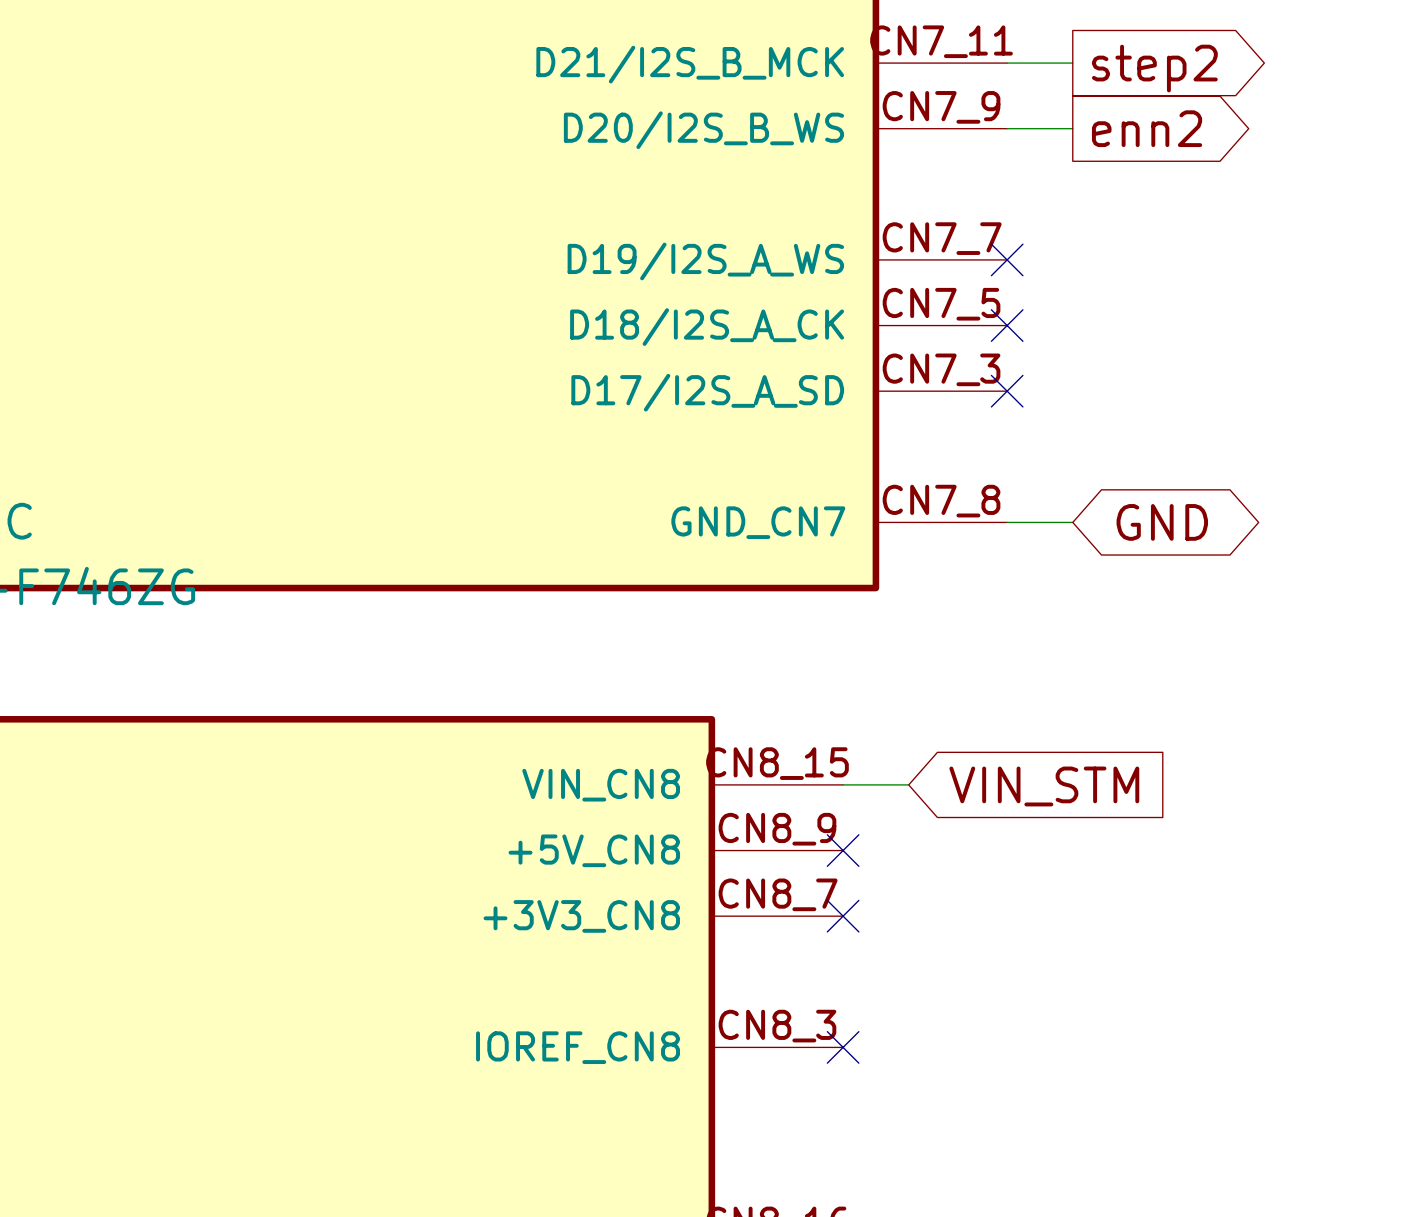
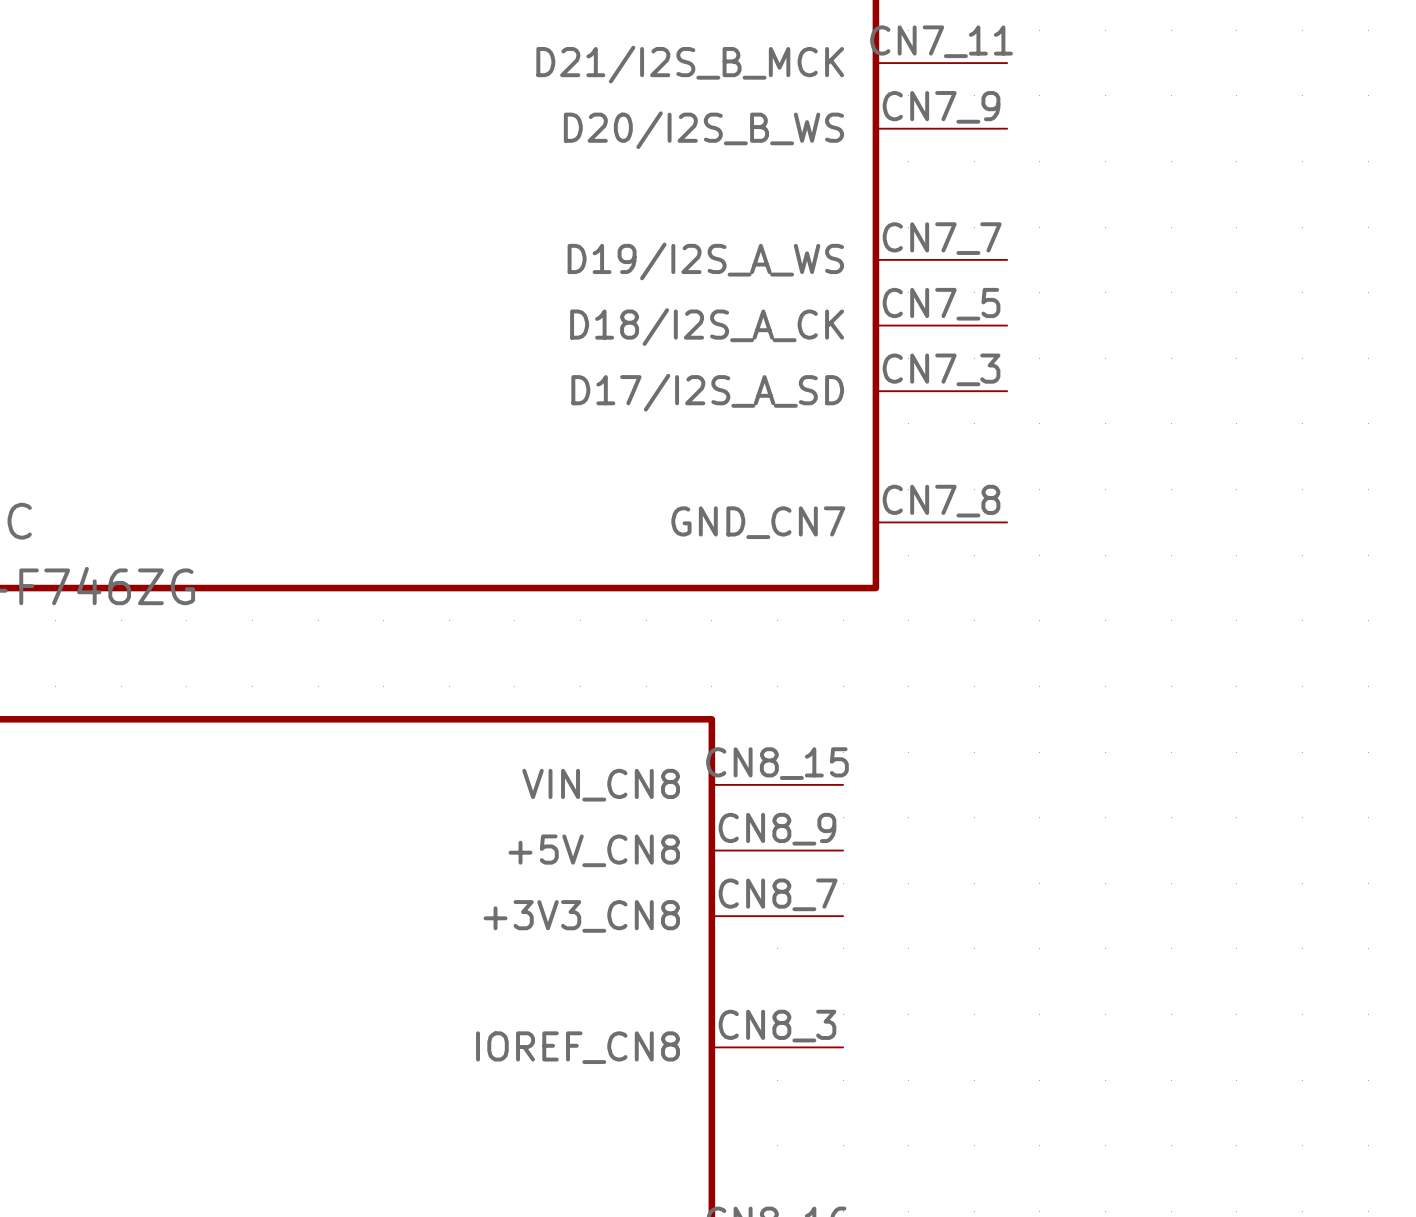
wire: (1007, 63) (1072, 63) -> none
global label: step2 (1154, 68) -> none
wire: (1007, 128) (1072, 128) -> none
global label: enn2 (1147, 128) -> none
no-connect mark: (1007, 259) -> none
no-connect mark: (1007, 325) -> none
no-connect mark: (1007, 391) -> none
wire: (1007, 522) (1072, 522) -> none
global label: GND (1162, 522) -> none
wire: (843, 784) (908, 784) -> none
global label: VIN_STM (1044, 786) -> none
no-connect mark: (843, 850) -> none
no-connect mark: (843, 916) -> none
no-connect mark: (843, 1047) -> none

